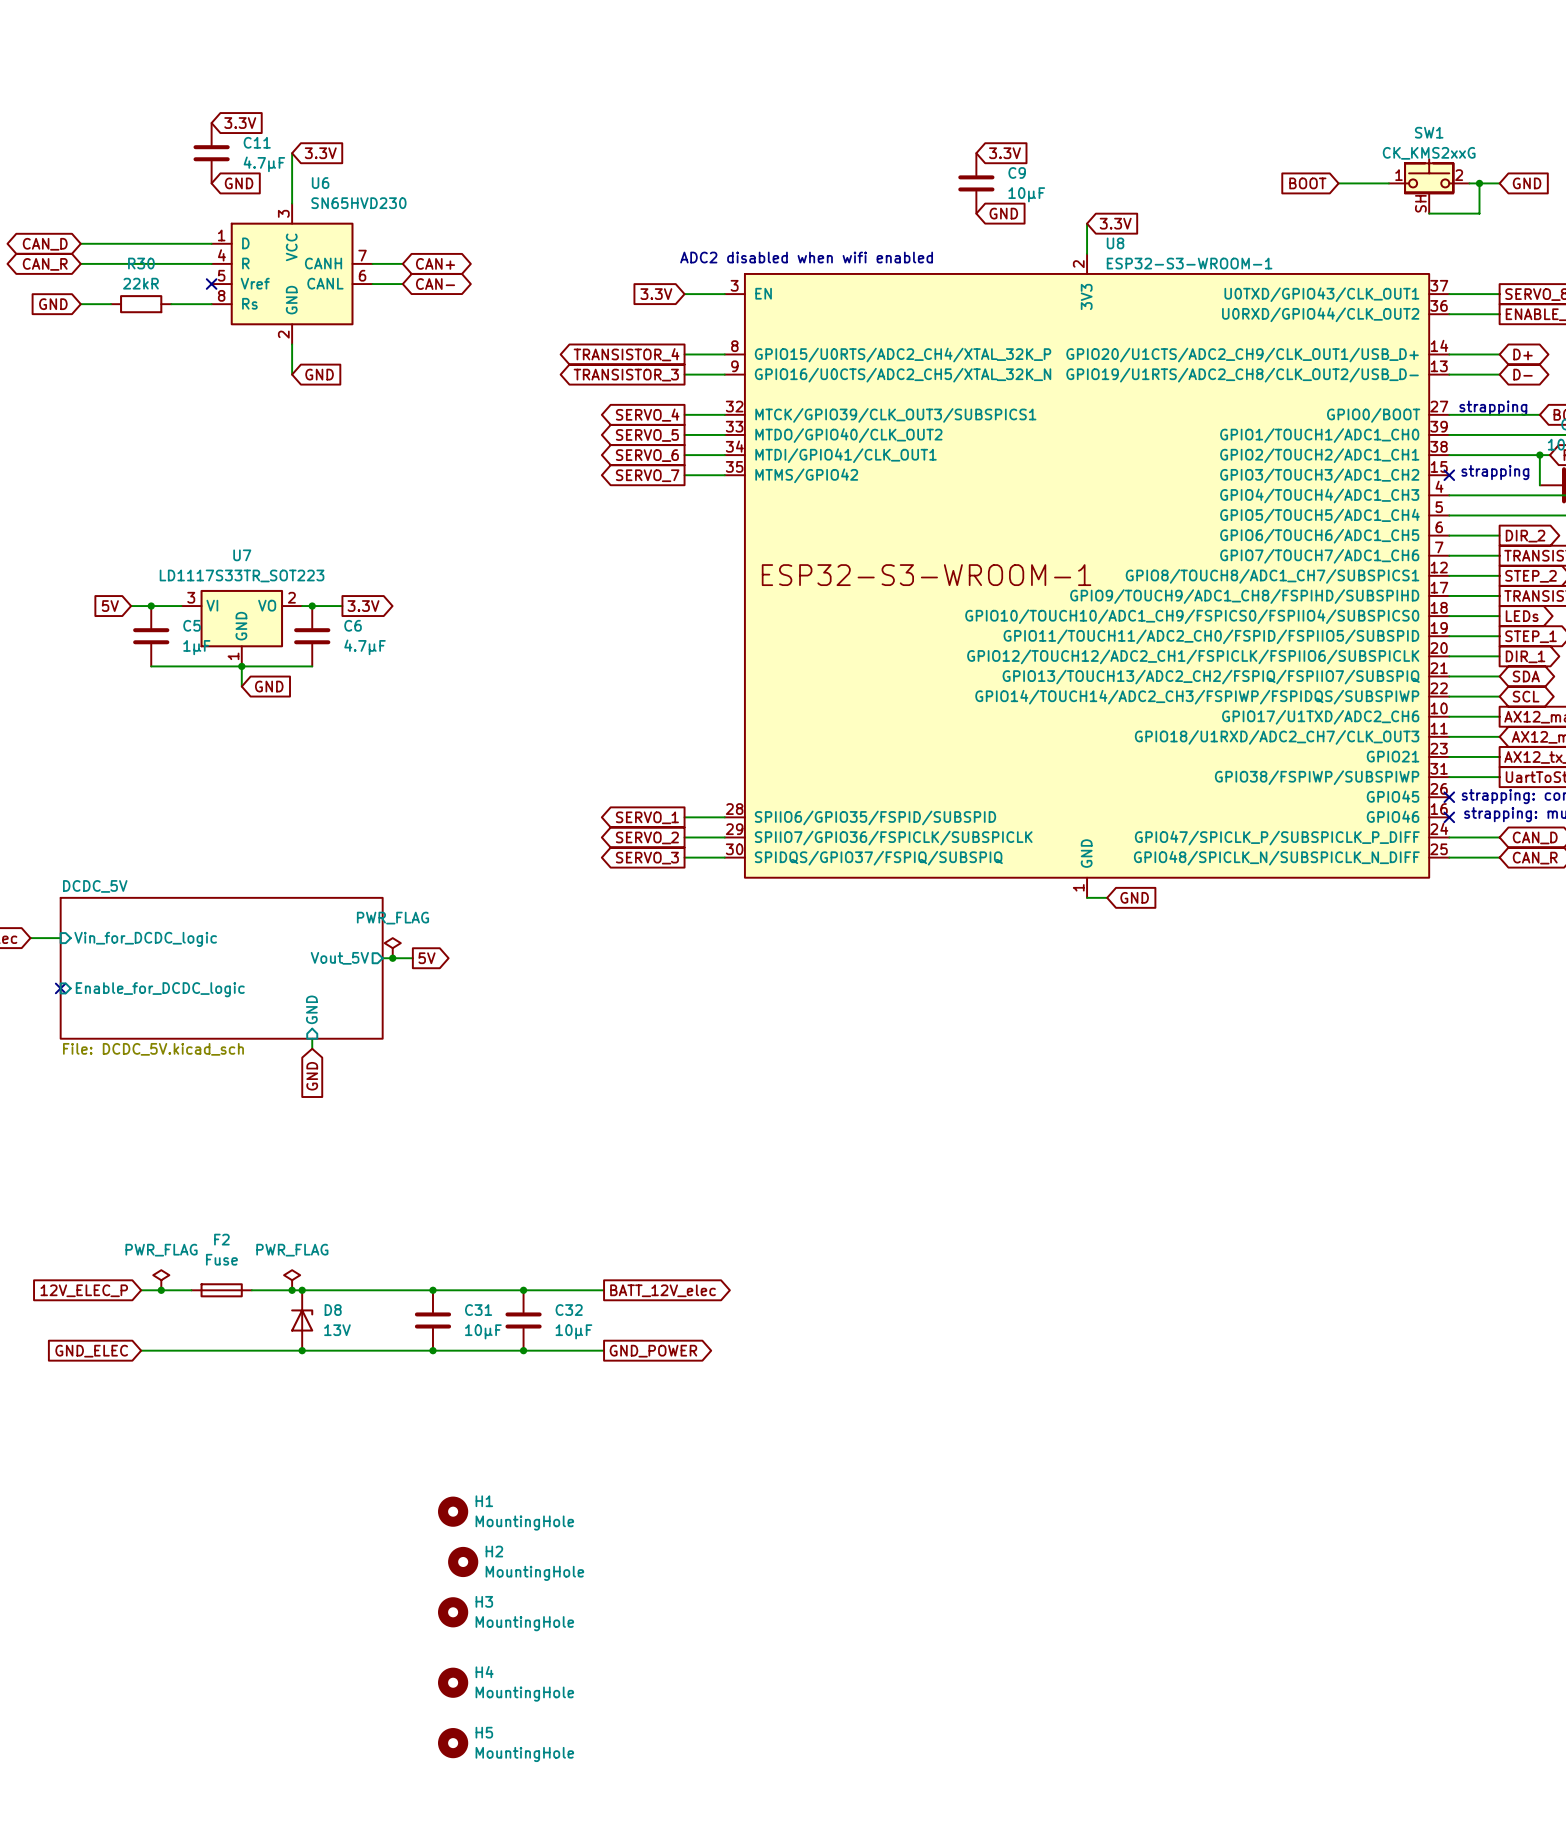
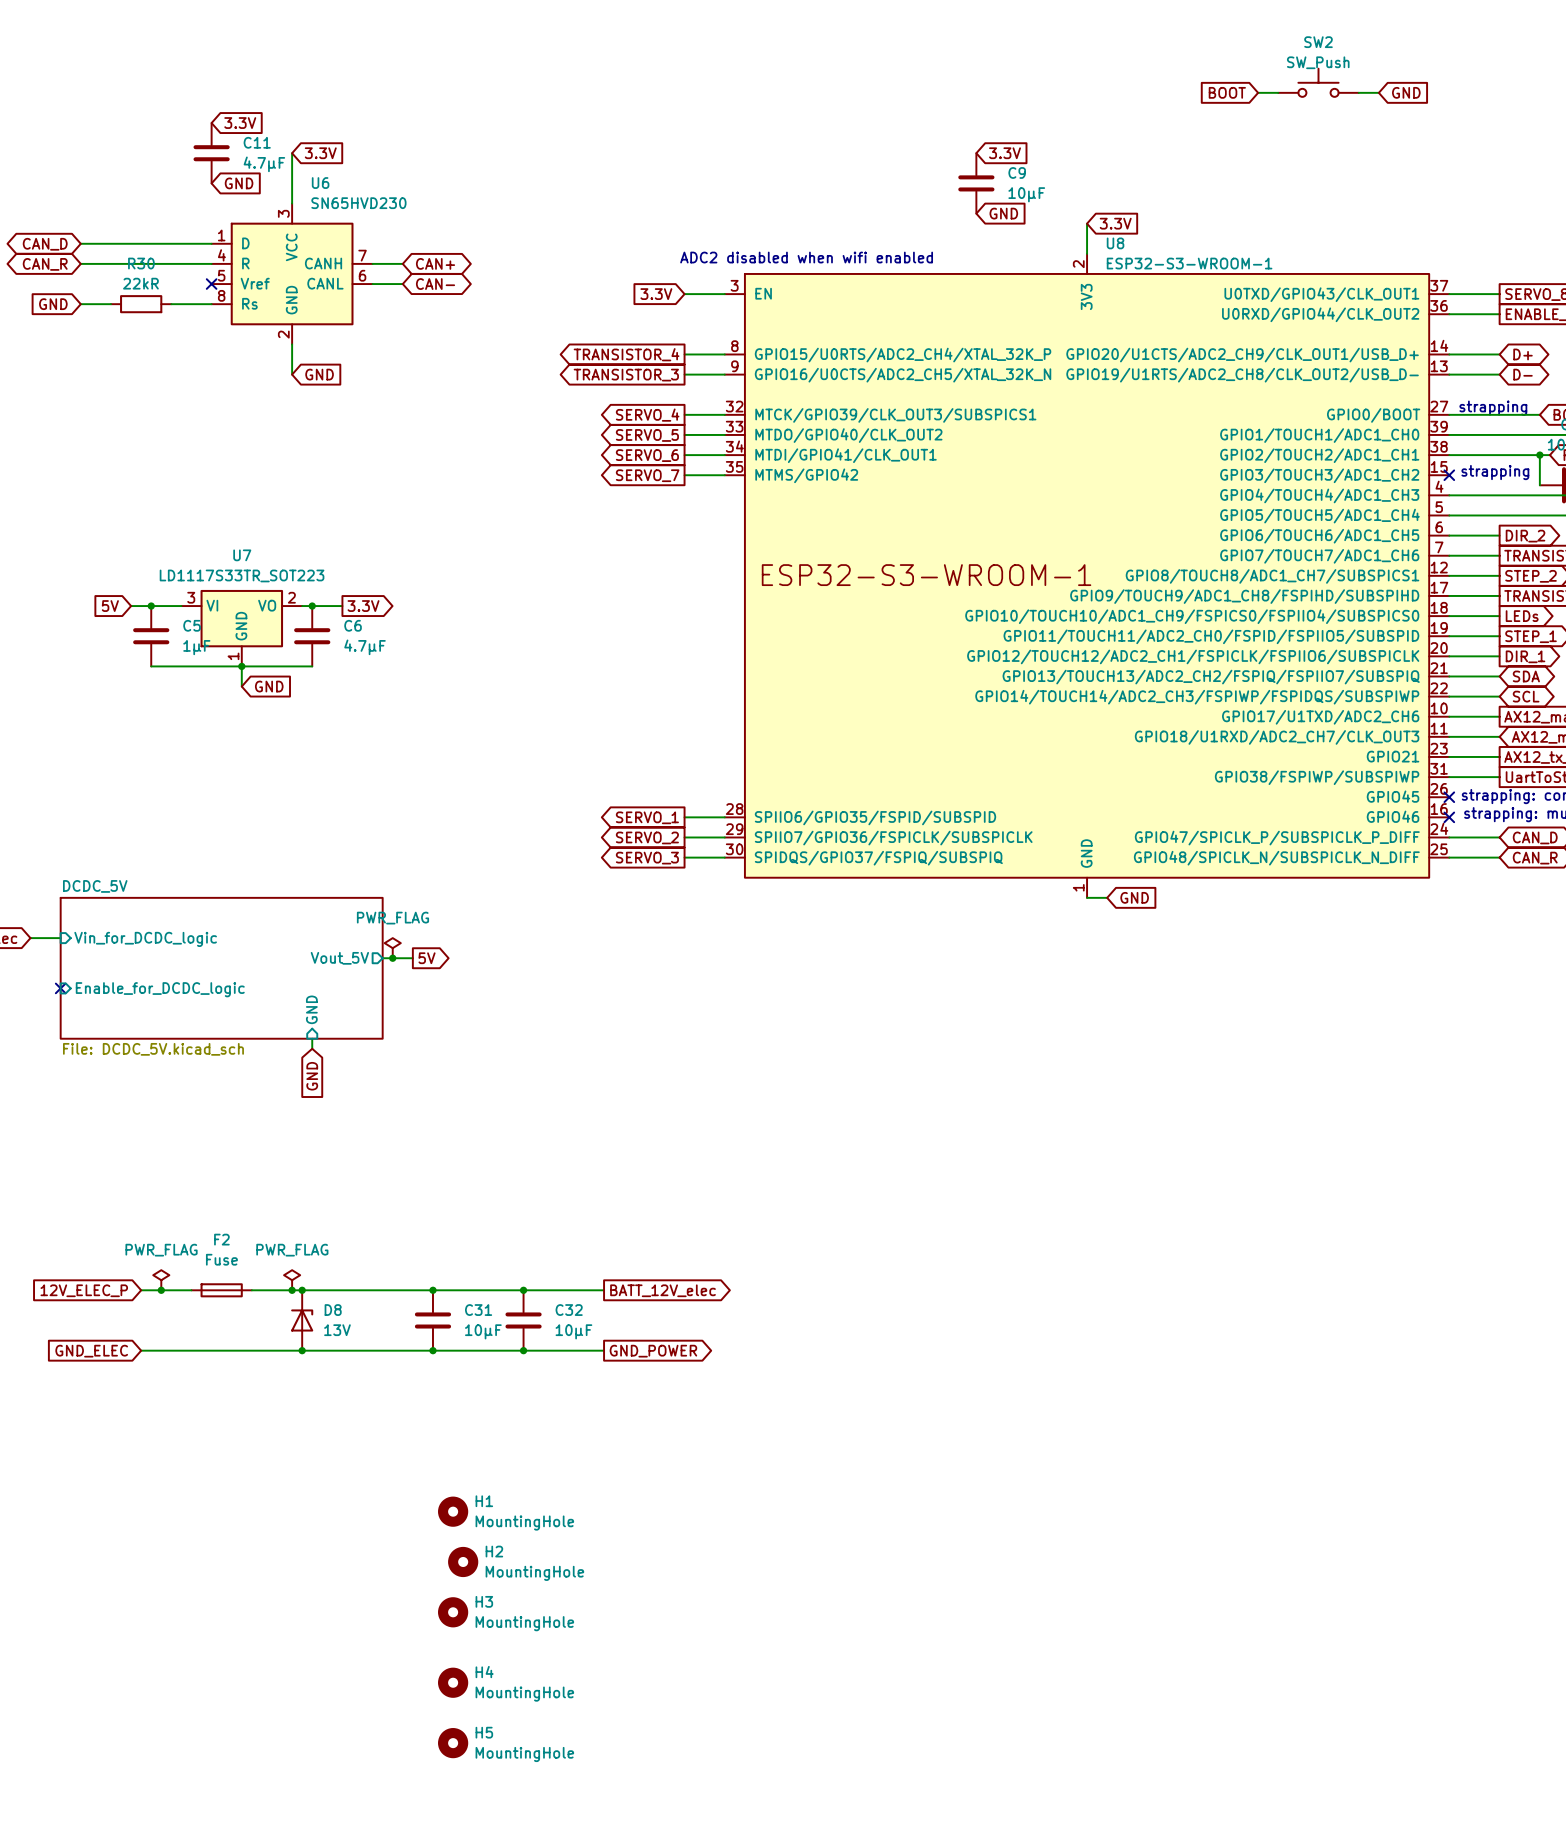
SW2: none -> SW_Push (1318, 82)
wire: none -> (1258, 92) (1278, 92)
wire: none -> (1358, 92) (1378, 92)
global label position: BOOT (1307, 183) -> BOOT (1227, 92)
wire: (1338, 183) (1388, 183) -> none
wire: (1469, 183) (1499, 183) -> none
wire: (1479, 183) (1479, 213) (1429, 213) -> none
junction: (1479, 183) -> none
global label position: GND (1527, 183) -> GND (1406, 92)
SW1: CK_KMS2xxG (1429, 186) -> none

